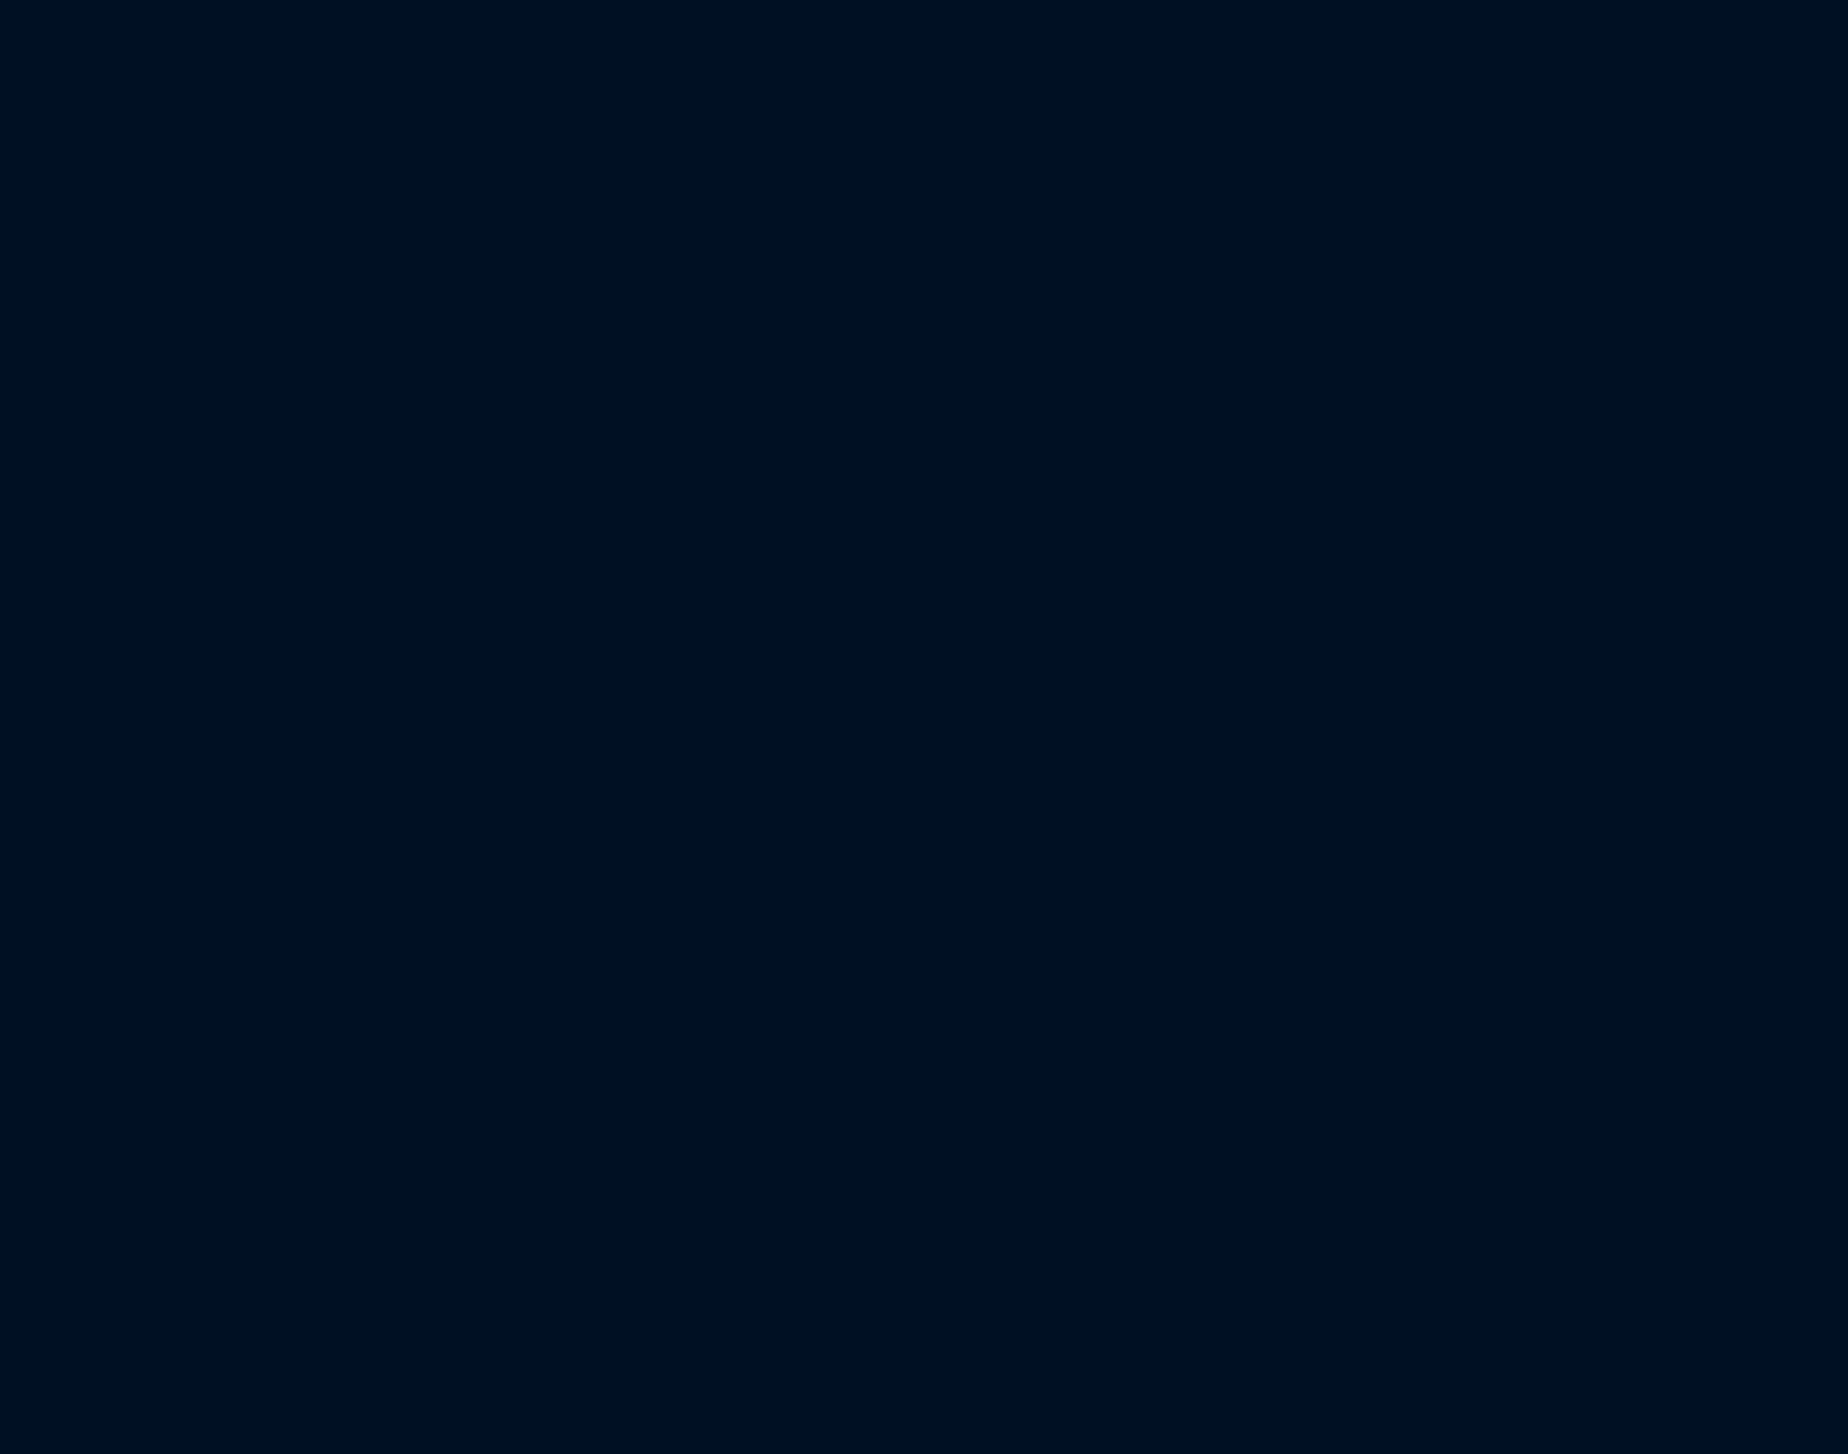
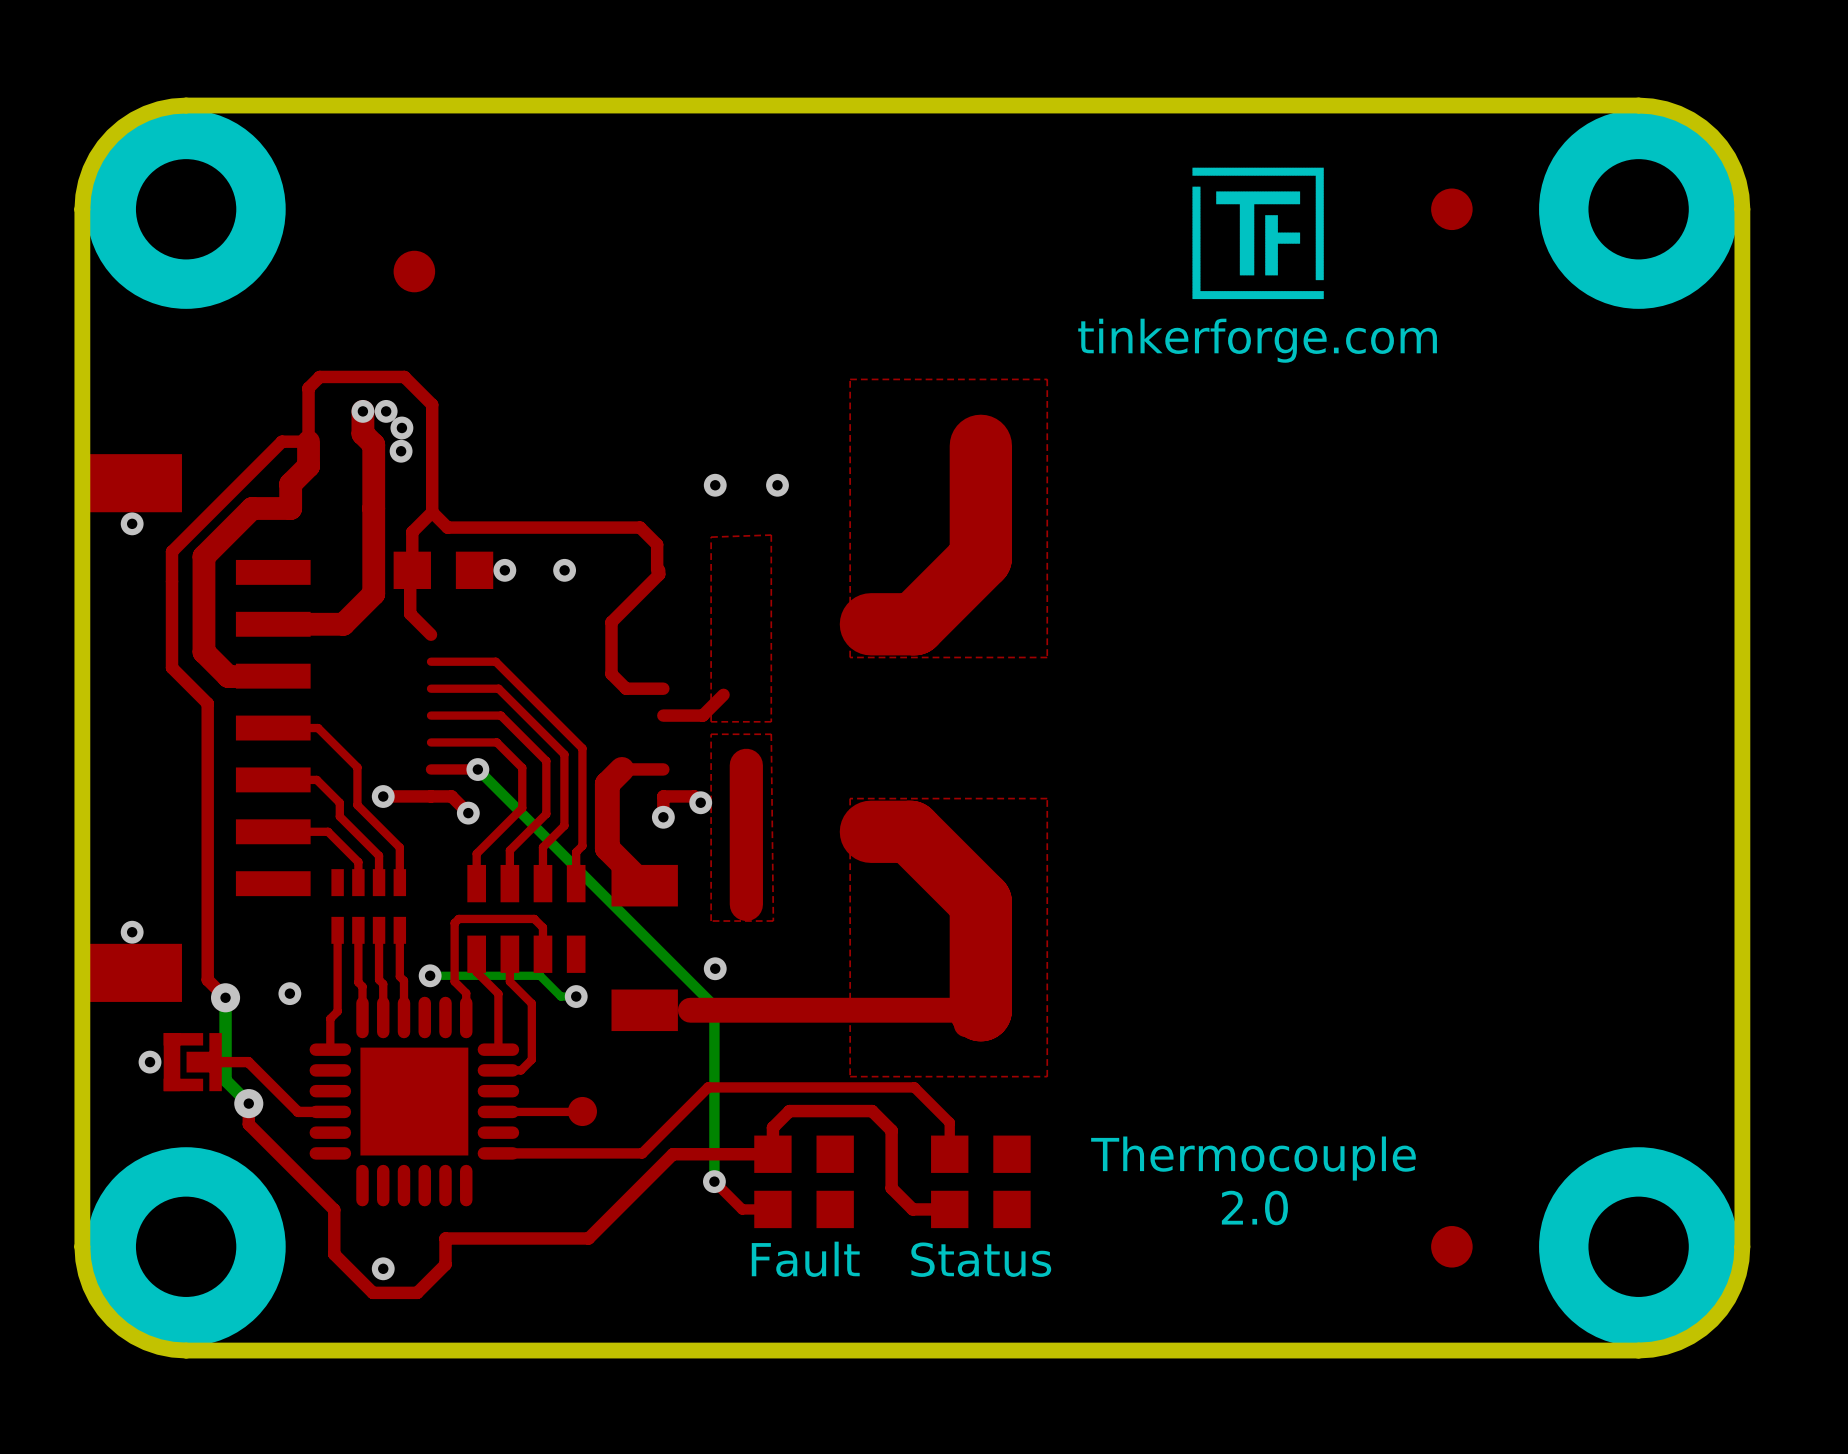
board edge: none -> (186, 105) (1638, 105) (1652, 106) (1678, 113) (1701, 126) (1720, 146) (1728, 157) (1738, 182) (1742, 209) (1742, 1246) (1738, 1273) (1728, 1298) (1720, 1309) (1711, 1320) (1690, 1336) (1665, 1347) (1638, 1350) (186, 1350) (159, 1347) (134, 1336) (122, 1329) (112, 1320) (96, 1298) (85, 1273) (82, 1246) (82, 209) (83, 195) (90, 169) (96, 157) (112, 135) (122, 126) (146, 113) (172, 106) (186, 105)
drawing: none -> [1192, 167, 1324, 300]
part: none -> (186, 209)
part: none -> (1451, 209)
part: none -> (1638, 209)
part: none -> (414, 271)
text: none -> tinkerforge.com (1257, 340)
top zone outline: none -> (850, 379) (850, 657) (1047, 657) (1047, 379) (850, 379)
top track: none -> (362, 411) (362, 433) (373, 444) (373, 593) (343, 624) (273, 624)
via: none -> (362, 411)
via: none -> (386, 411)
via: none -> (401, 427)
top track: none -> (308, 441) (308, 466) (290, 484) (290, 508) (252, 508) (203, 556) (203, 652) (228, 676) (275, 676)
top track: none -> (308, 441) (281, 441) (172, 551) (172, 667) (207, 703) (207, 979) (225, 997)
top track: none -> (308, 441) (308, 388) (319, 376) (404, 376) (432, 404) (432, 512)
top track: none -> (980, 445) (980, 557) (914, 624) (870, 624)
via: none -> (401, 451)
via: none -> (715, 485)
via: none -> (777, 485)
top track: none -> (432, 512) (447, 527) (640, 527) (657, 544) (657, 570)
top track: none -> (432, 512) (412, 532) (412, 570)
via: none -> (132, 523)
top zone outline: none -> (771, 535) (711, 537) (711, 721) (771, 721) (771, 535)
top track: none -> (410, 570) (410, 613) (431, 634)
part: none -> (443, 570)
via: none -> (504, 570)
via: none -> (564, 570)
top track: none -> (659, 570) (659, 574) (611, 622) (611, 674) (626, 688) (663, 688)
top track: none -> (431, 661) (495, 661) (582, 748) (582, 845) (576, 852) (576, 883)
top track: none -> (431, 688) (498, 688) (564, 754) (564, 825) (542, 847) (542, 883)
top track: none -> (723, 694) (702, 715) (663, 715)
top track: none -> (431, 715) (500, 715) (546, 761) (546, 813) (509, 850) (509, 883)
part: none -> (196, 728)
top track: none -> (273, 728) (318, 728) (357, 767) (357, 805) (399, 847) (399, 882)
top zone outline: none -> (711, 734) (711, 921) (773, 921) (771, 734) (711, 734)
top track: none -> (431, 742) (496, 742) (522, 767) (522, 808) (476, 853) (476, 883)
top track: none -> (746, 765) (746, 904)
top track: none -> (431, 769) (477, 769)
bottom track: none -> (477, 769) (714, 1006) (714, 1181)
via: none -> (477, 769)
top track: none -> (663, 769) (621, 769) (607, 784) (607, 848) (644, 885)
top track: none -> (273, 779) (316, 779) (339, 802) (339, 816) (379, 855) (379, 882)
top track: none -> (383, 796) (451, 796) (468, 813)
via: none -> (383, 796)
top zone outline: none -> (850, 798) (850, 1076) (1047, 1076) (1047, 798) (850, 798)
top track: none -> (700, 802) (694, 796) (663, 796) (663, 817)
via: none -> (700, 802)
via: none -> (468, 813)
via: none -> (663, 817)
top track: none -> (273, 831) (328, 831) (358, 862) (358, 882)
top track: none -> (870, 831) (910, 831) (980, 902) (980, 1010) (966, 1024)
part: none -> (368, 906)
part: none -> (526, 918)
top track: none -> (337, 930) (337, 1011) (330, 1018) (330, 1049)
top track: none -> (358, 930) (358, 982) (362, 986) (362, 1017)
top track: none -> (379, 930) (379, 979) (383, 984) (383, 1017)
top track: none -> (399, 930) (399, 976) (403, 980) (403, 1017)
via: none -> (132, 932)
part: none -> (644, 947)
top track: none -> (476, 954) (476, 972) (498, 993) (498, 1049)
top track: none -> (509, 954) (509, 981) (531, 1003) (531, 1059) (521, 1070) (496, 1070)
top track: none -> (542, 954) (542, 927) (534, 918) (458, 918) (454, 923) (454, 981) (466, 993) (466, 1017)
via: none -> (715, 968)
bottom track: none -> (430, 975) (540, 975) (560, 996) (576, 996)
via: none -> (430, 975)
via: none -> (289, 993)
via: none -> (576, 996)
bottom track: none -> (225, 997) (225, 1080) (248, 1103)
via: none -> (225, 997)
top track: none -> (690, 1010) (968, 1010)
via: none -> (150, 1062)
part: none -> (192, 1062)
top track: none -> (198, 1062) (248, 1062) (298, 1111) (330, 1111)
part: none -> (414, 1101)
top track: none -> (248, 1103) (248, 1124) (334, 1209) (334, 1254) (372, 1292) (417, 1292) (445, 1264) (445, 1238) (588, 1238) (672, 1154) (772, 1154) (772, 1127) (789, 1111) (872, 1111) (891, 1130) (891, 1188) (912, 1209) (949, 1209)
via: none -> (248, 1103)
top track: none -> (498, 1111) (582, 1111)
part: none -> (582, 1111)
top track: none -> (498, 1153) (642, 1153) (708, 1087) (914, 1087) (949, 1122) (949, 1154)
part: none -> (804, 1154)
part: none -> (980, 1154)
text: none -> Thermocouple (1253, 1158)
top track: none -> (714, 1181) (742, 1209) (772, 1209)
via: none -> (714, 1181)
text: none -> 2.0 (1254, 1207)
part: none -> (804, 1209)
part: none -> (980, 1209)
part: none -> (186, 1246)
part: none -> (1451, 1246)
part: none -> (1638, 1246)
text: none -> Fault (805, 1259)
text: none -> Status (981, 1259)
via: none -> (383, 1268)

